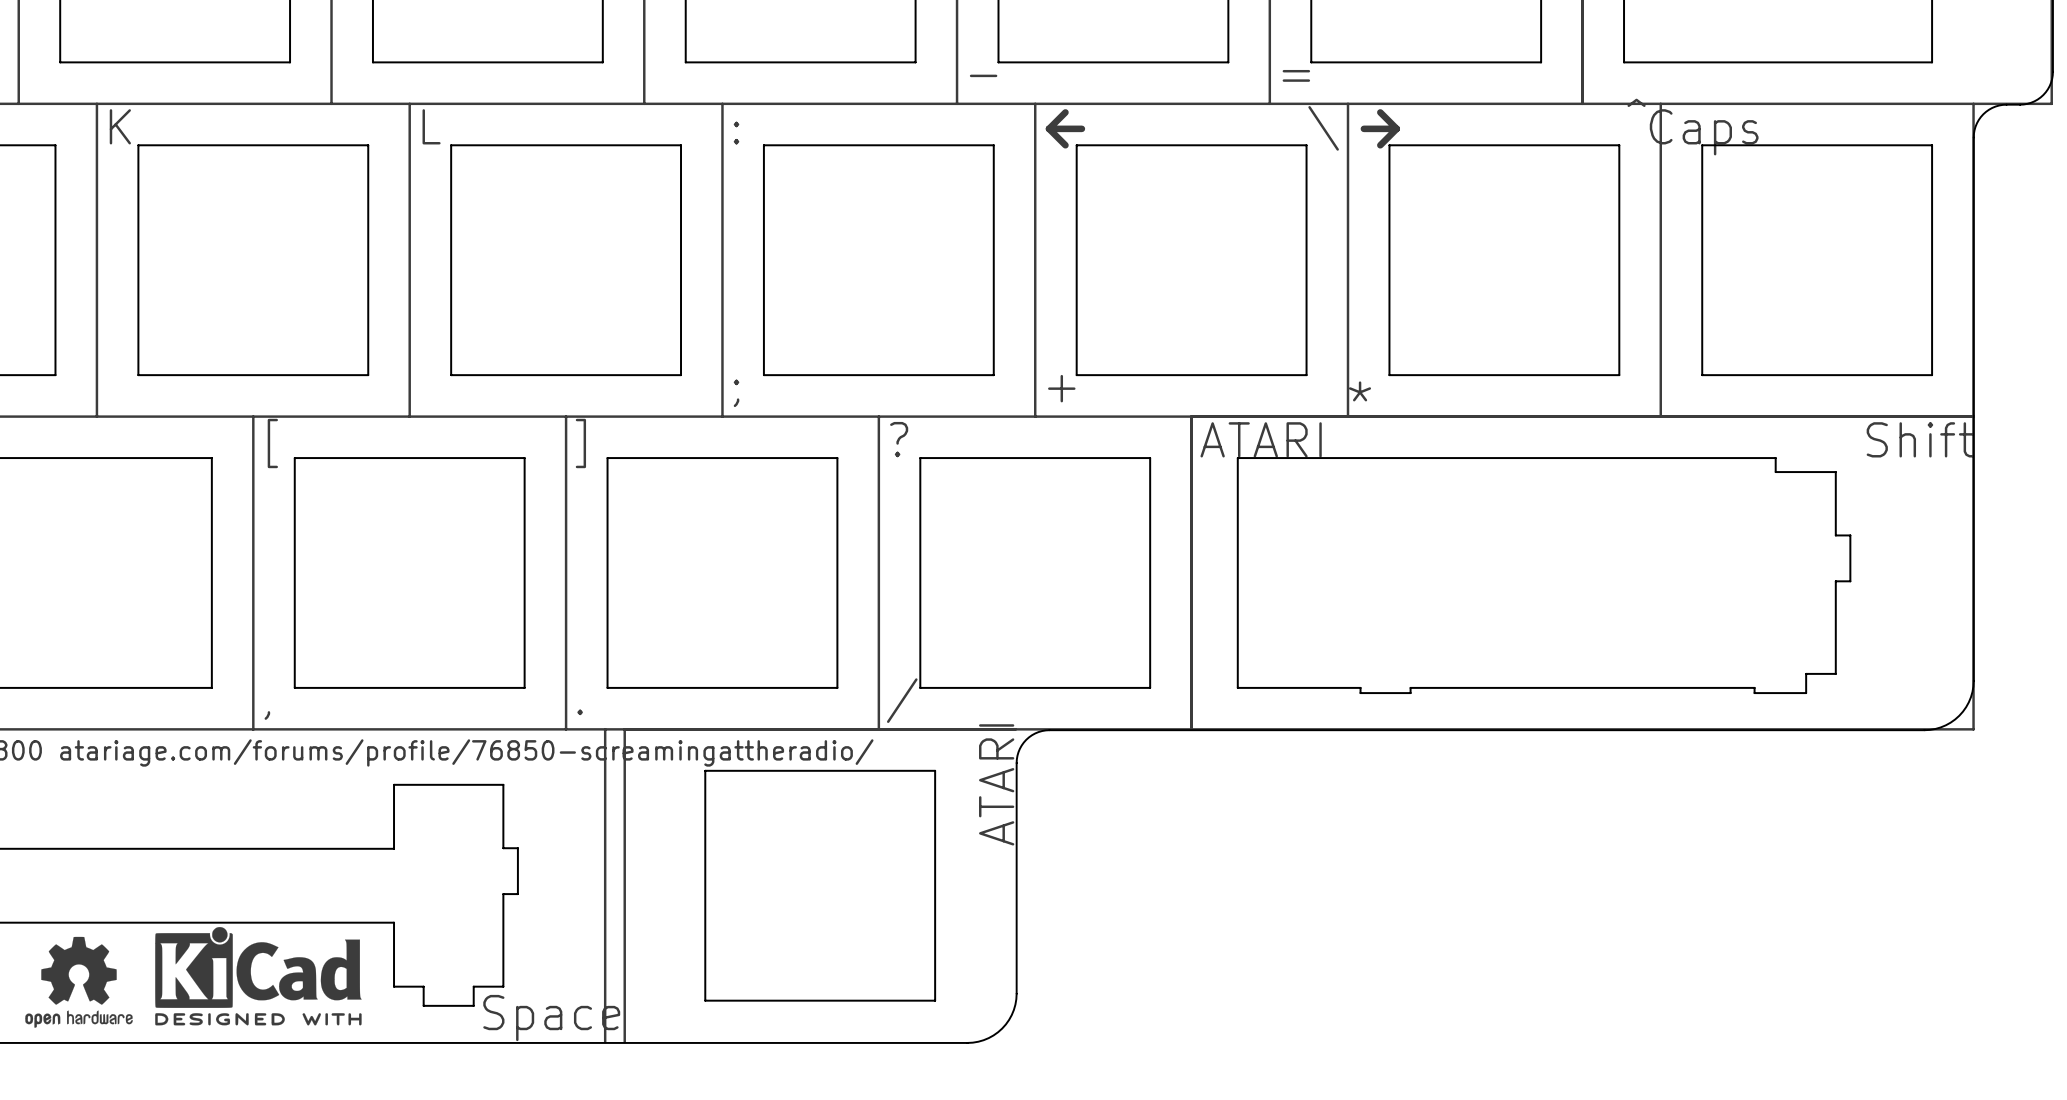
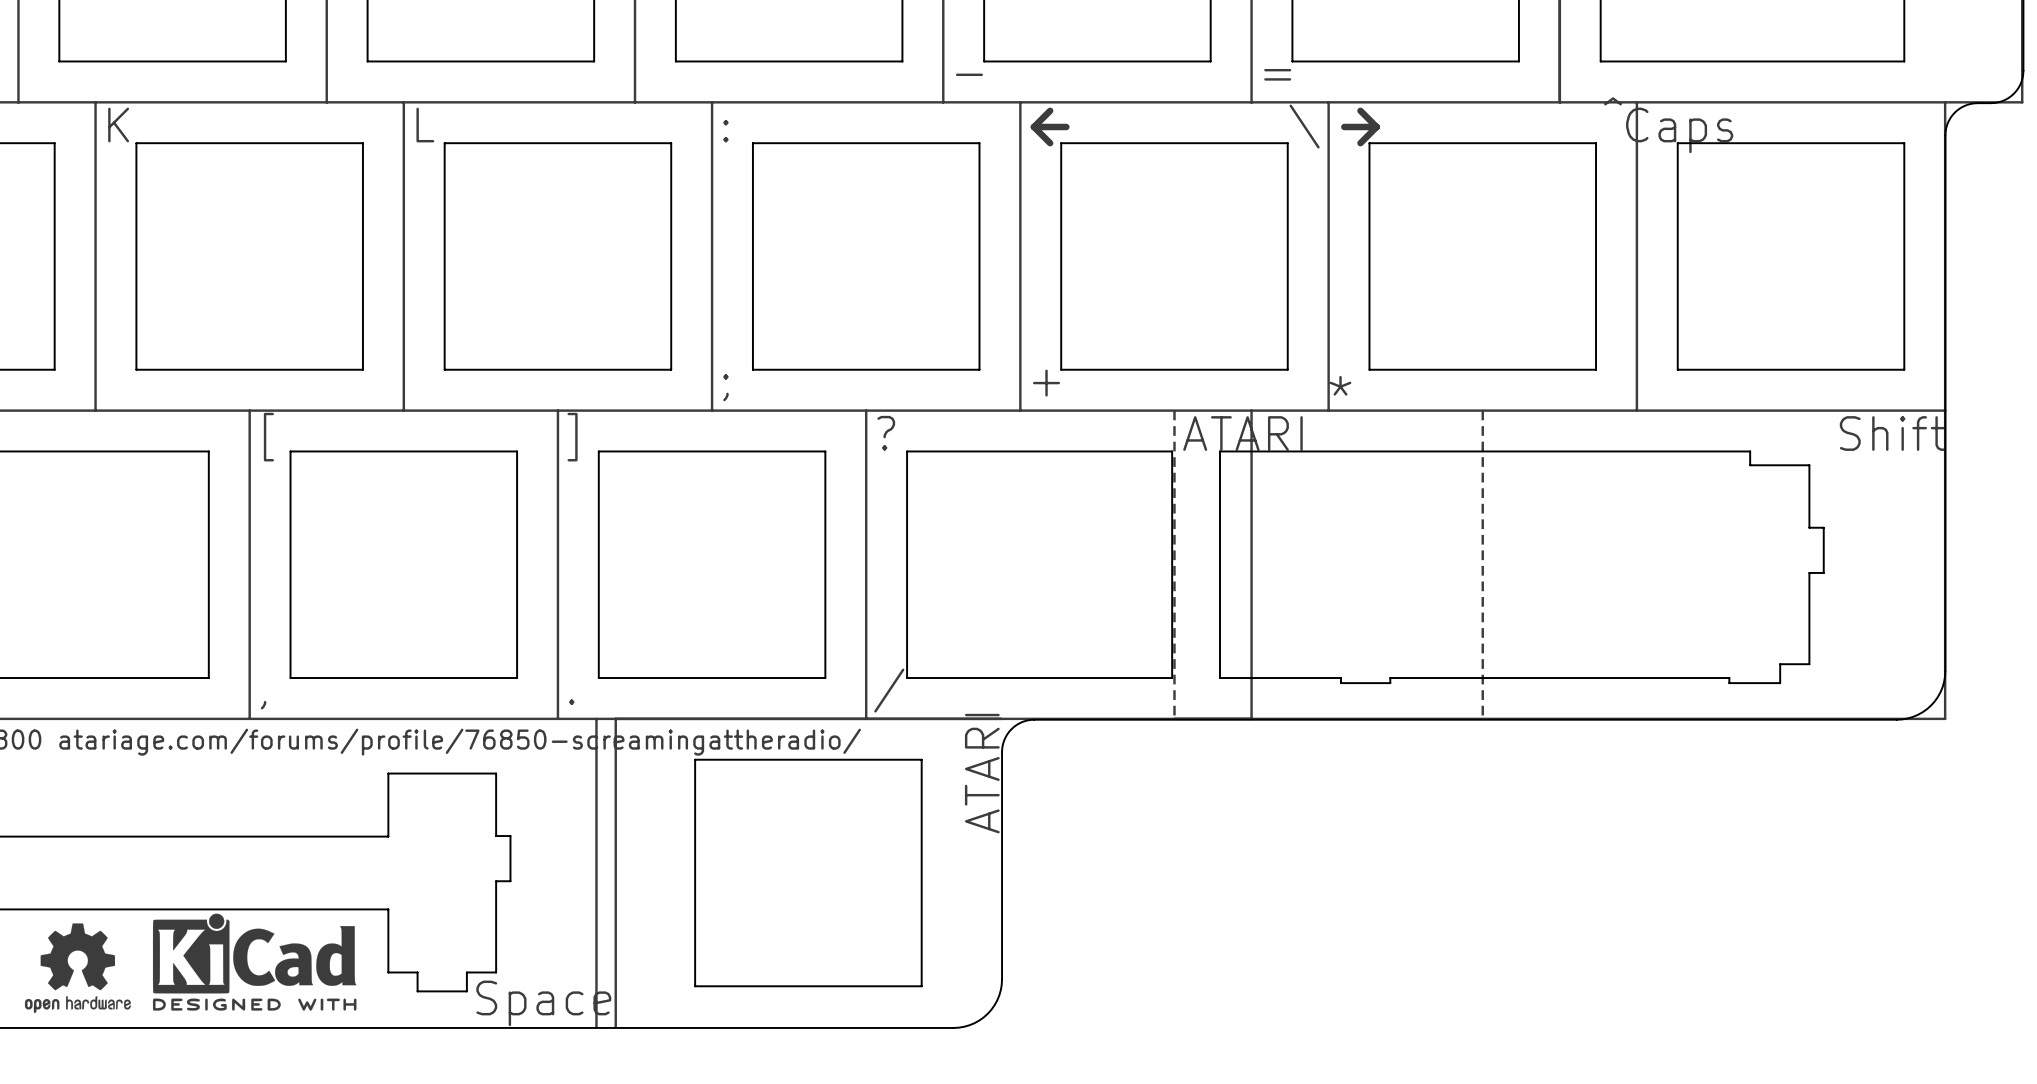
drawing: [877, 415, 1193, 731] -> none
drawing: none -> [865, 409, 1253, 721]
drawing shape: [1190, 415, 1975, 731] -> [1173, 409, 1947, 721]

